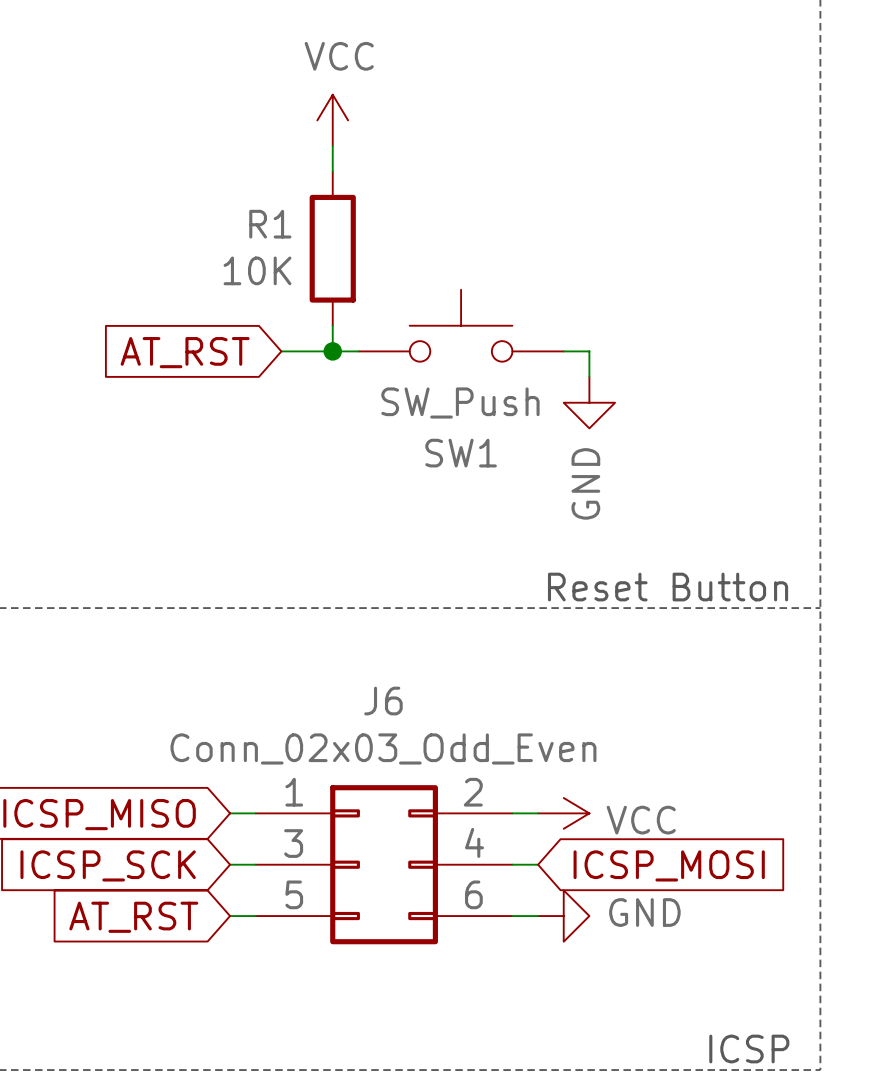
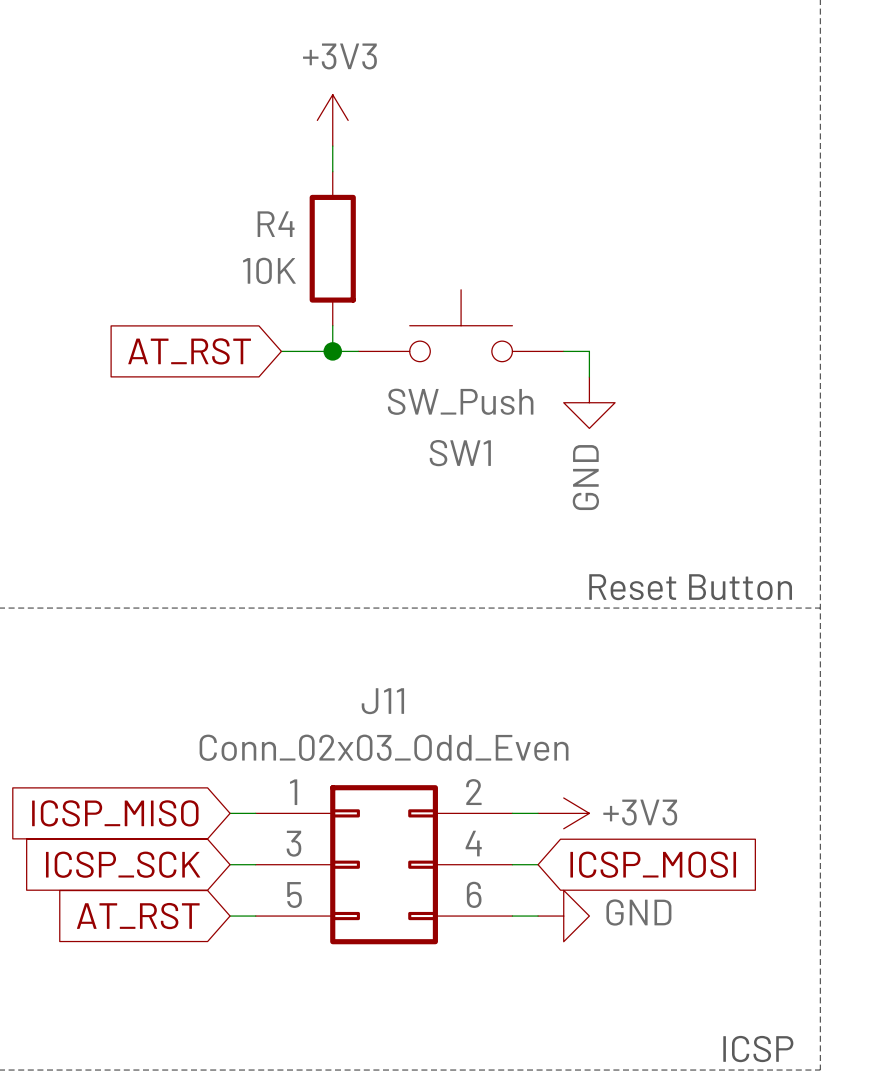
power symbol: VCC (332, 120) -> +3V3 (332, 120)
R1 name: R1 (270, 224) -> R4 (276, 224)
J6 name: J6 (383, 701) -> J11 (382, 701)
power symbol: VCC (563, 813) -> +3V3 (563, 813)

